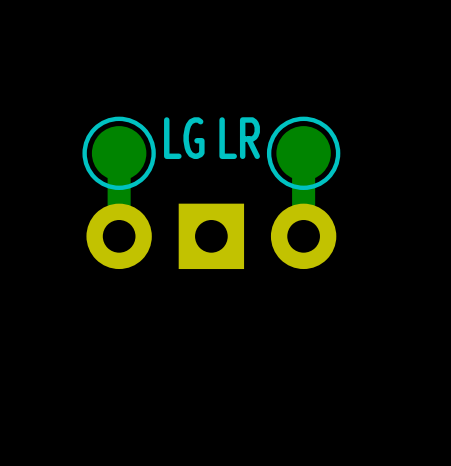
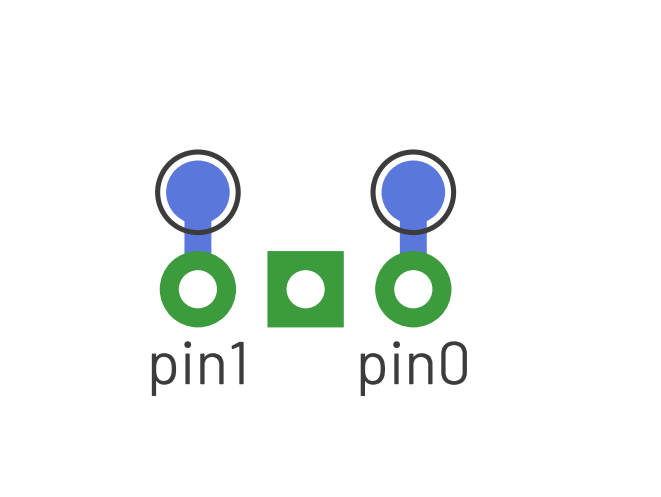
text: LG (184, 138) -> none
text: LR (239, 138) -> none
text: none -> pin1 (197, 368)
text: none -> pin0 (413, 368)

